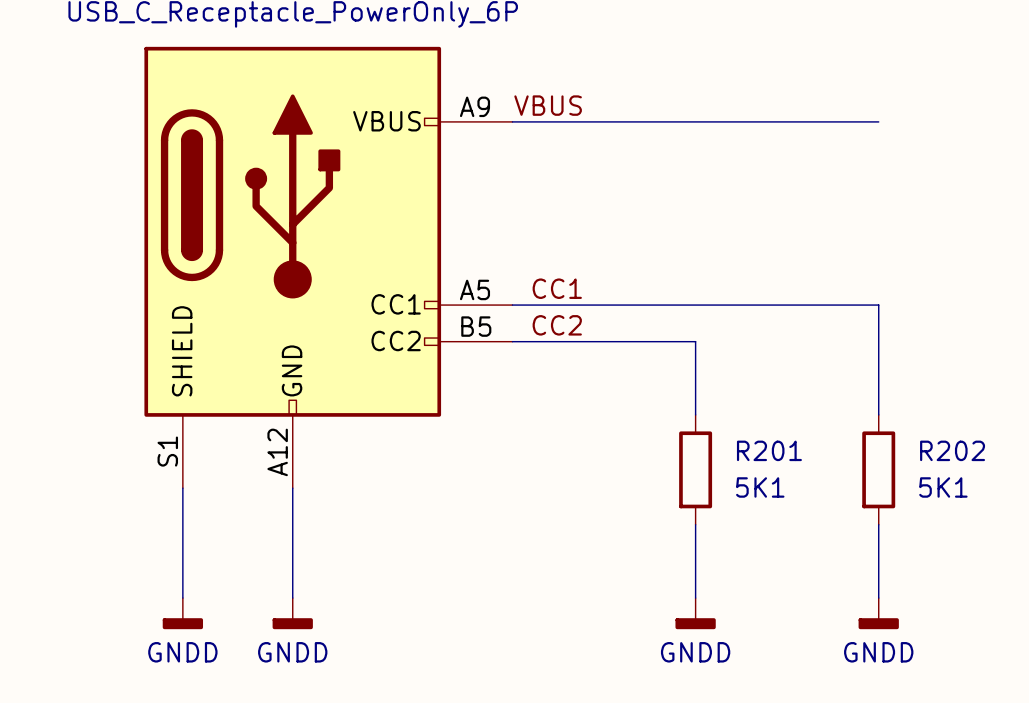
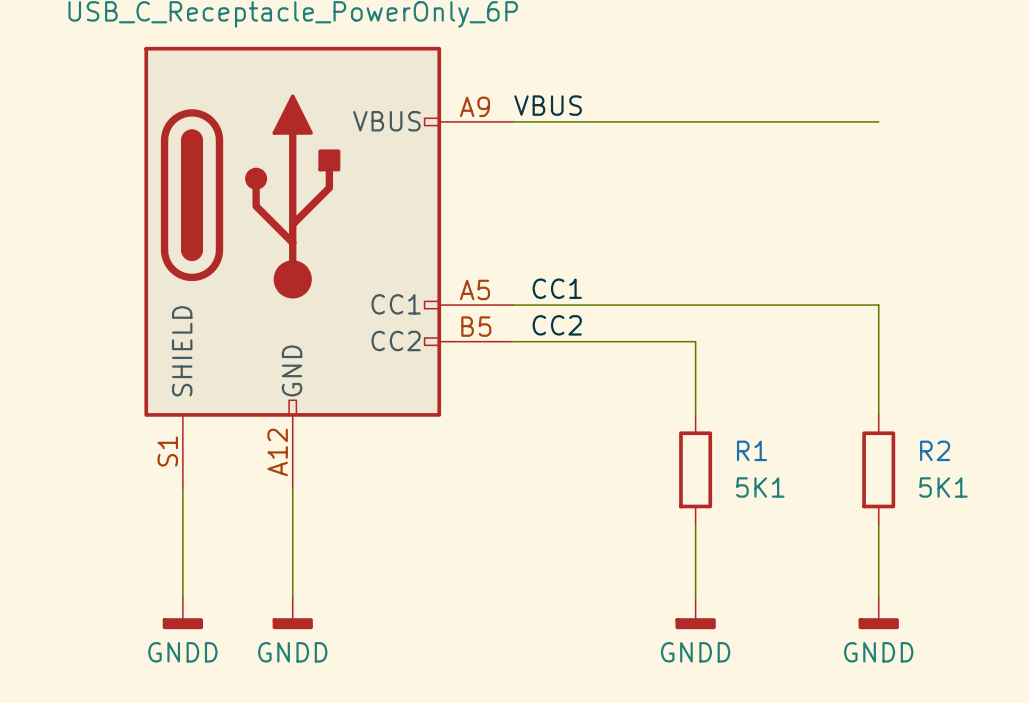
R201 name: R201 (769, 450) -> R1 (751, 450)
R202 name: R202 (952, 450) -> R2 (935, 450)

